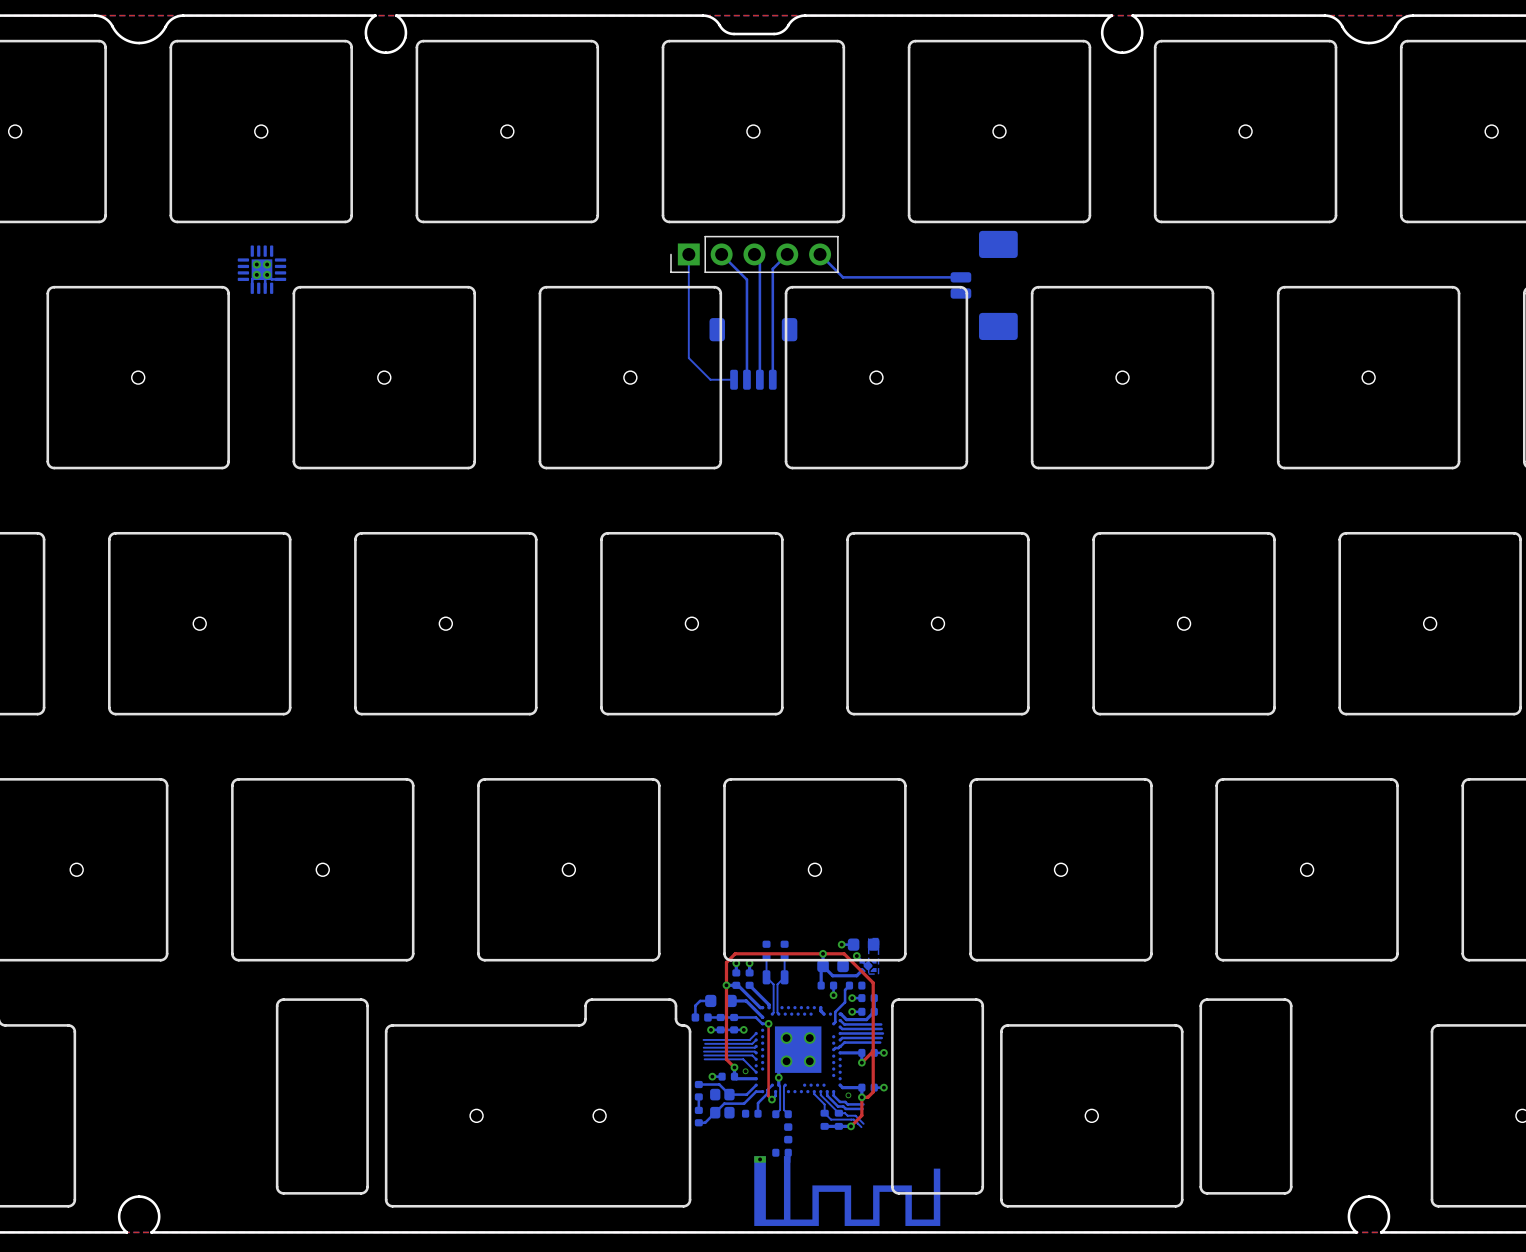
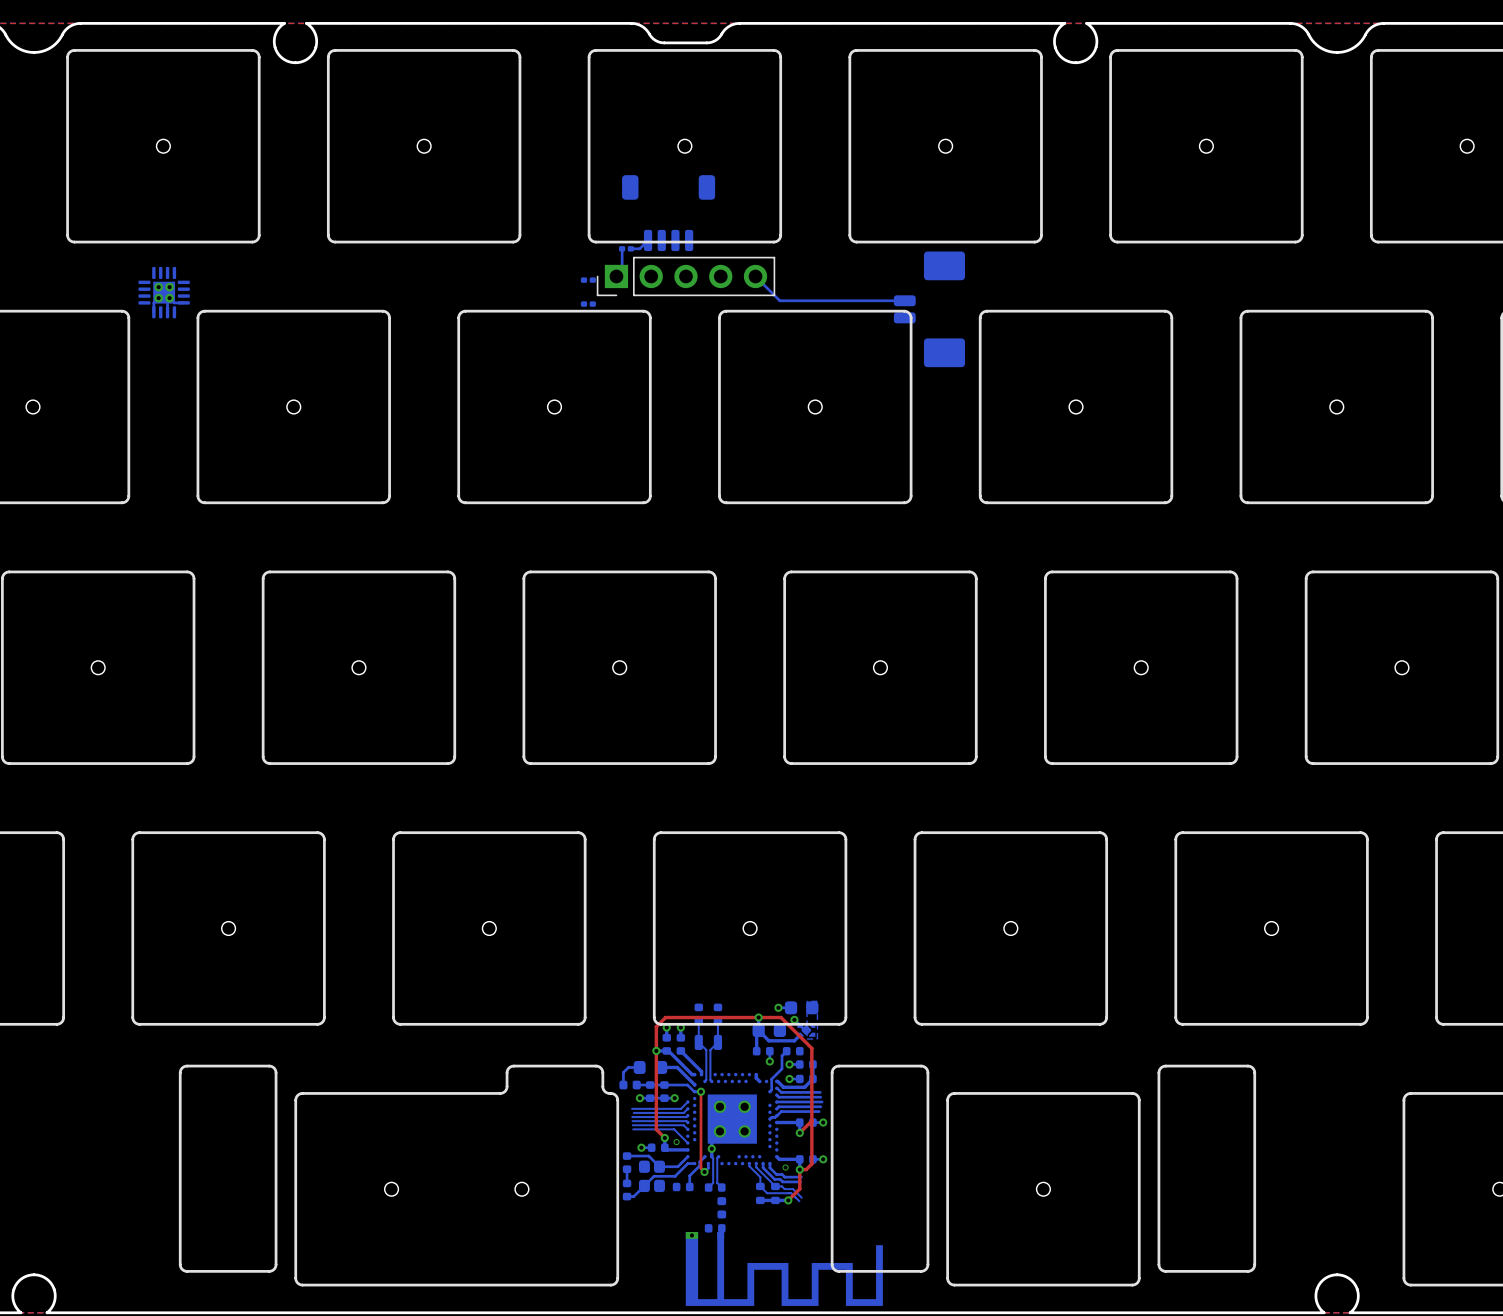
bottom track: none -> (648, 240) (639, 248) (630, 248)
bottom track: none -> (622, 248) (622, 270) (616, 276) (616, 272)
part: none -> (626, 248)
bottom track: (688, 254) (688, 358) (710, 379) (734, 379) -> none
bottom track: (721, 254) (746, 279) (746, 379) -> none
bottom track: (754, 254) (759, 259) (759, 379) -> none
bottom track: (787, 254) (772, 268) (772, 379) -> none
part: none -> (588, 280)
part: none -> (588, 304)
part position: (753, 353) -> (668, 213)

